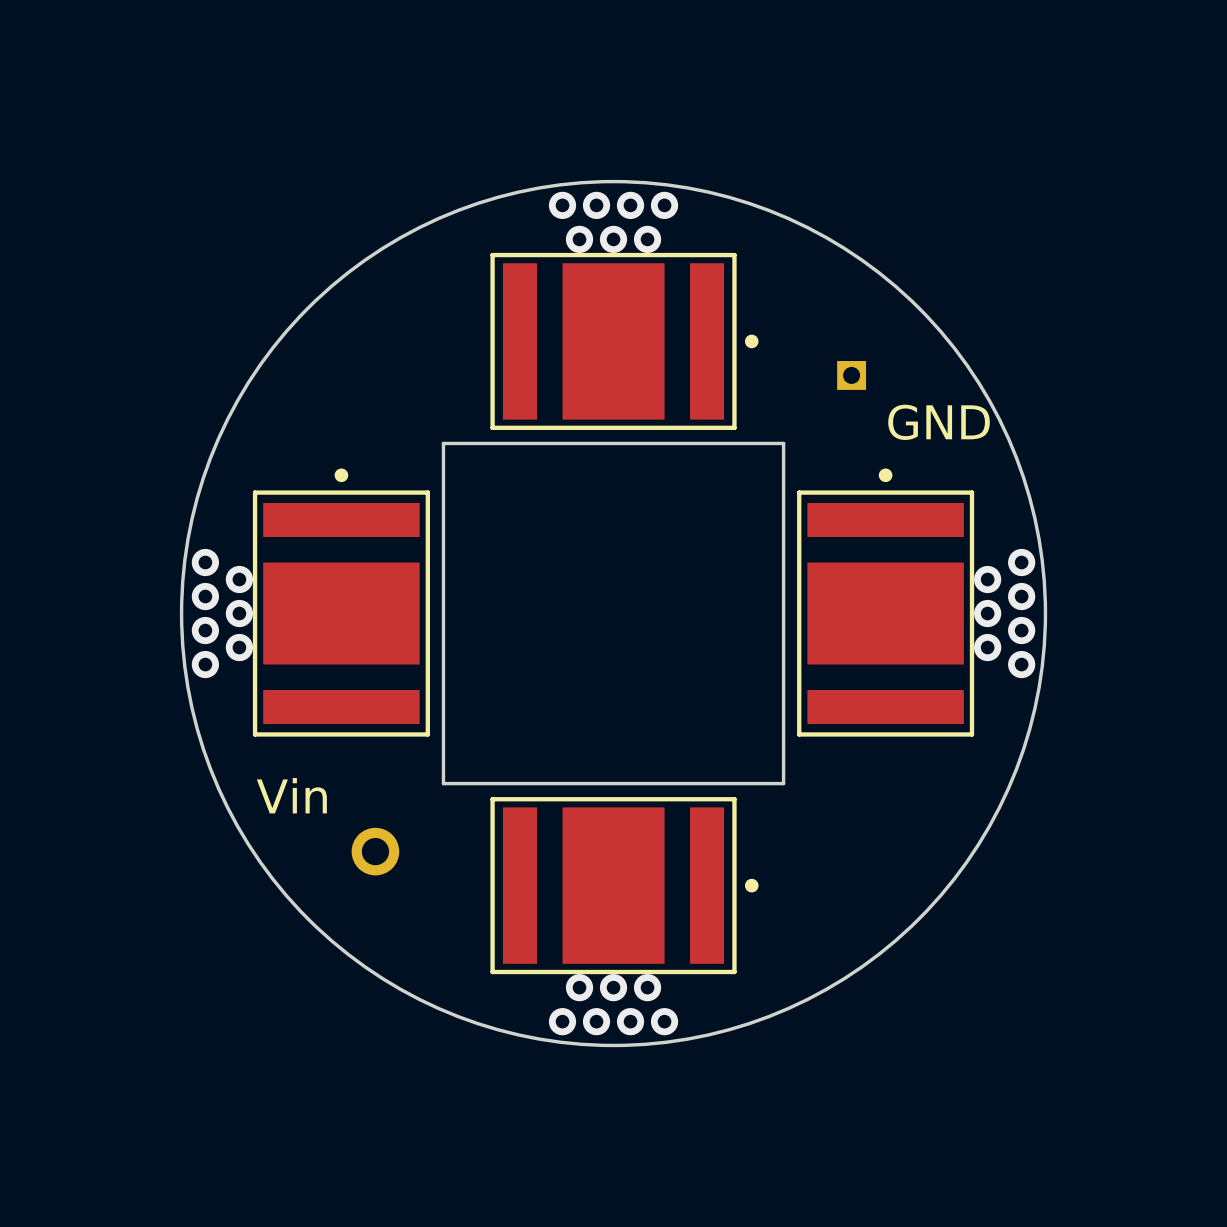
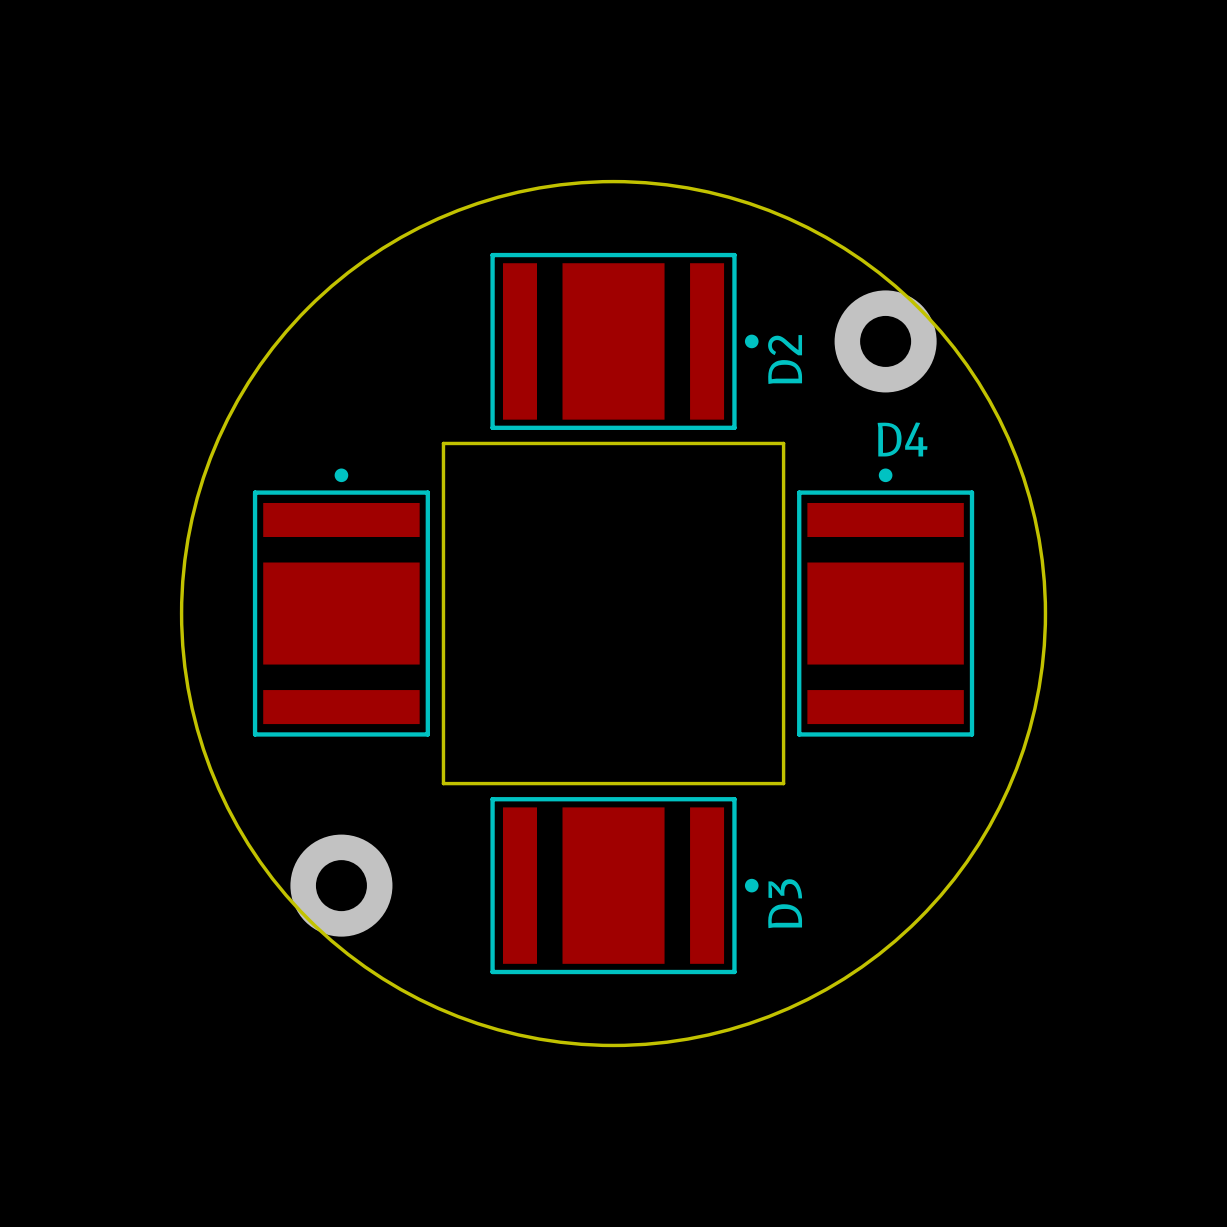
via: (562, 205) -> none
via: (596, 205) -> none
via: (630, 205) -> none
via: (664, 205) -> none
via: (579, 239) -> none
via: (613, 239) -> none
via: (647, 239) -> none
via: none -> (885, 341)
D2 name: none -> D2 (785, 359)
part: (851, 375) -> none
text: GND (939, 422) -> none
D4 name: none -> D4 (902, 439)
via: (205, 562) -> none
via: (1021, 562) -> none
via: (239, 579) -> none
via: (987, 579) -> none
via: (205, 596) -> none
via: (1021, 596) -> none
via: (239, 613) -> none
via: (987, 613) -> none
via: (205, 630) -> none
via: (1021, 630) -> none
via: (239, 647) -> none
via: (987, 647) -> none
via: (205, 664) -> none
via: (1021, 664) -> none
text: Vin (291, 795) -> none
part: (375, 851) -> none
via: none -> (341, 885)
D3 name: none -> D3 (785, 903)
via: (579, 987) -> none
via: (613, 987) -> none
via: (647, 987) -> none
via: (562, 1021) -> none
via: (596, 1021) -> none
via: (630, 1021) -> none
via: (664, 1021) -> none

